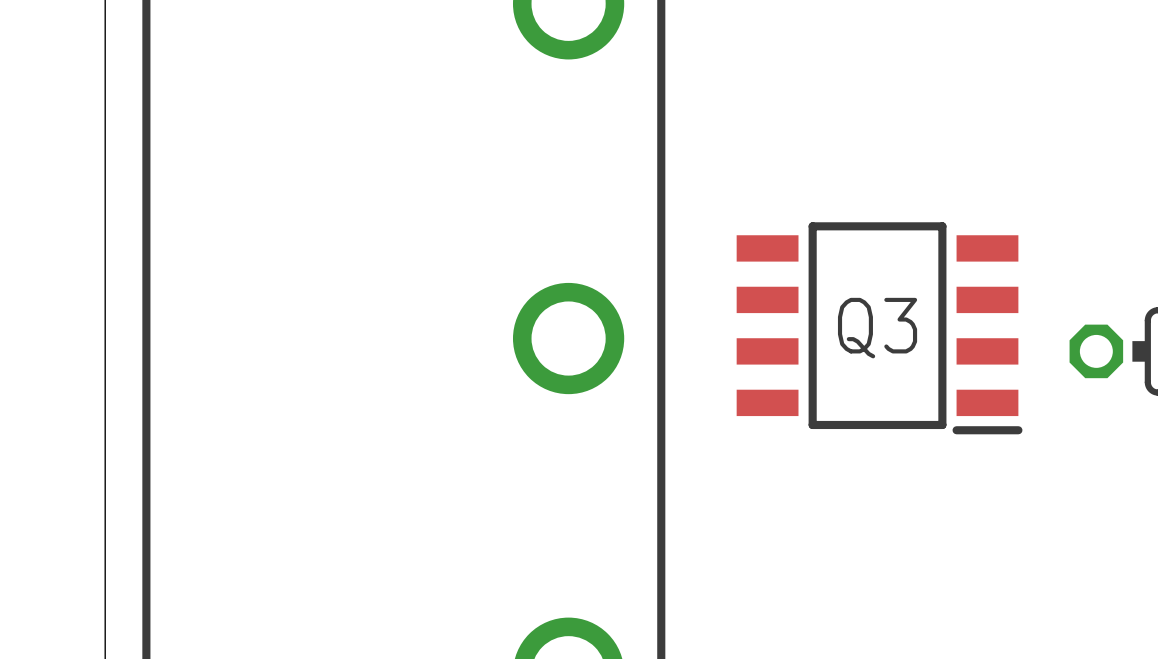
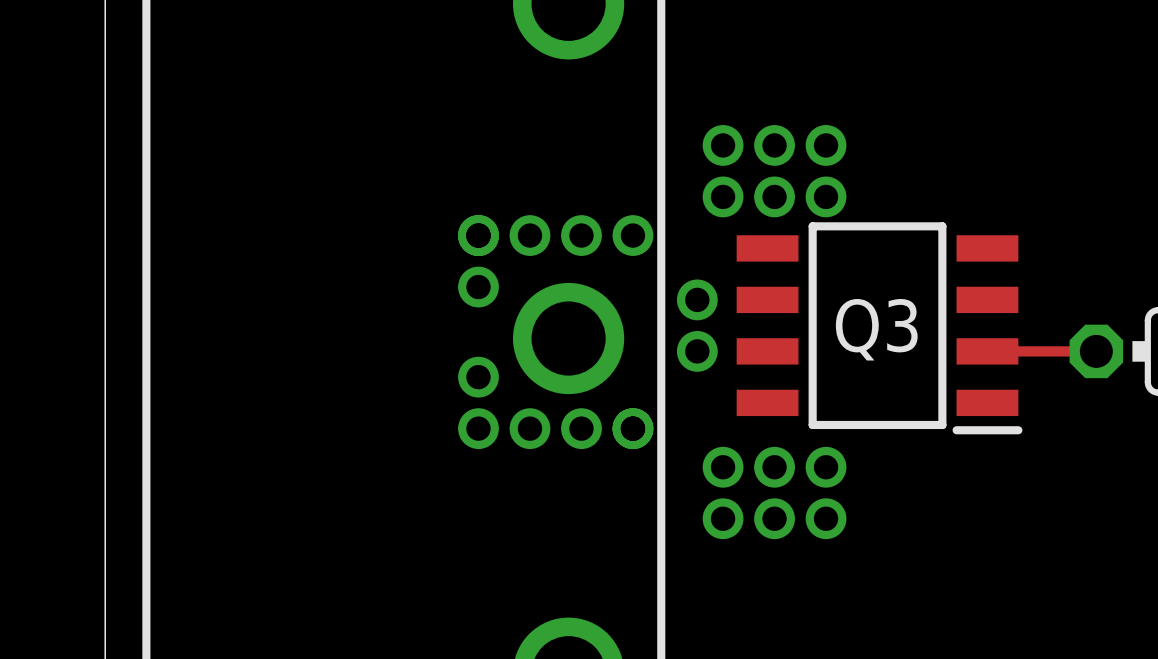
via: none -> (723, 145)
via: none -> (774, 145)
via: none -> (826, 145)
via: none -> (723, 196)
via: none -> (774, 196)
via: none -> (826, 196)
via: none -> (478, 235)
via: none -> (529, 235)
via: none -> (581, 235)
via: none -> (632, 235)
via: none -> (478, 287)
via: none -> (697, 299)
via: none -> (697, 351)
top track: none -> (987, 351) (1096, 351)
via: none -> (478, 377)
via: none -> (478, 428)
via: none -> (529, 428)
via: none -> (581, 428)
via: none -> (632, 428)
via: none -> (723, 467)
via: none -> (774, 467)
via: none -> (826, 467)
via: none -> (723, 518)
via: none -> (774, 518)
via: none -> (826, 518)

